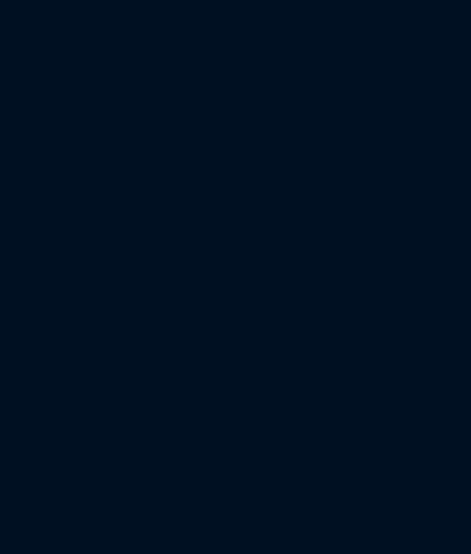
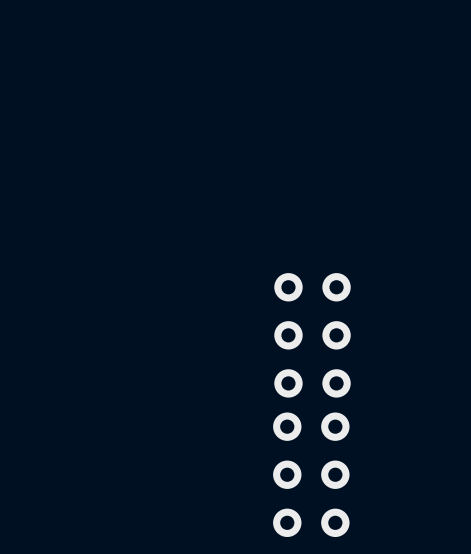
via: none -> (288, 287)
via: none -> (336, 287)
via: none -> (288, 335)
via: none -> (336, 335)
via: none -> (288, 383)
via: none -> (336, 383)
via: none -> (287, 426)
via: none -> (335, 426)
via: none -> (287, 474)
via: none -> (335, 474)
via: none -> (287, 522)
via: none -> (335, 522)

